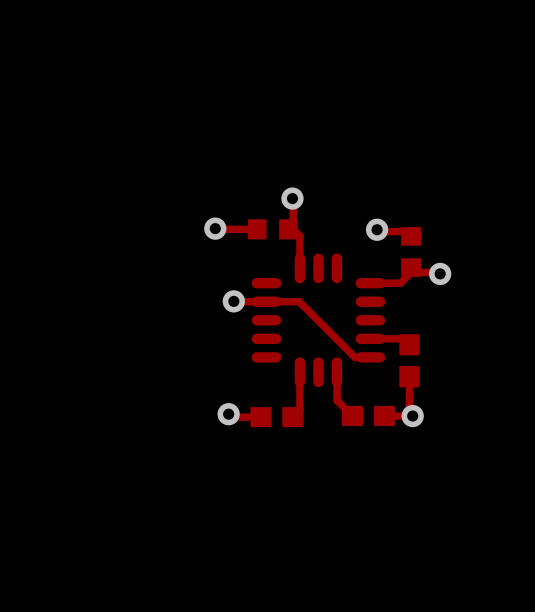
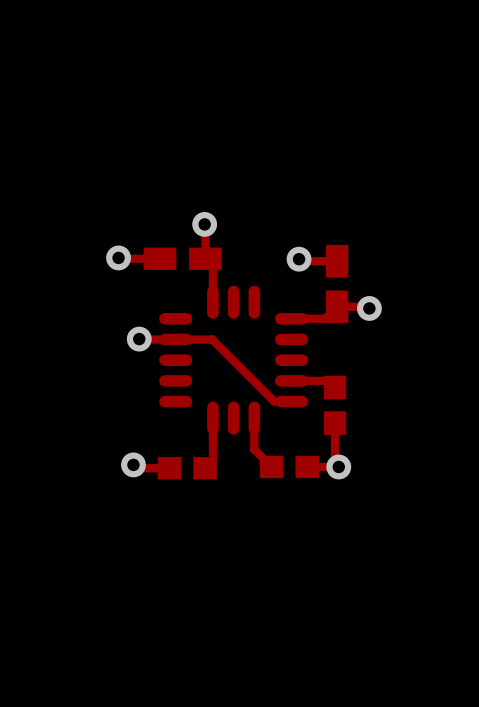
part footprint: [247, 219, 298, 240] -> [143, 247, 222, 270]
part footprint: [401, 227, 422, 277] -> [325, 244, 349, 324]

